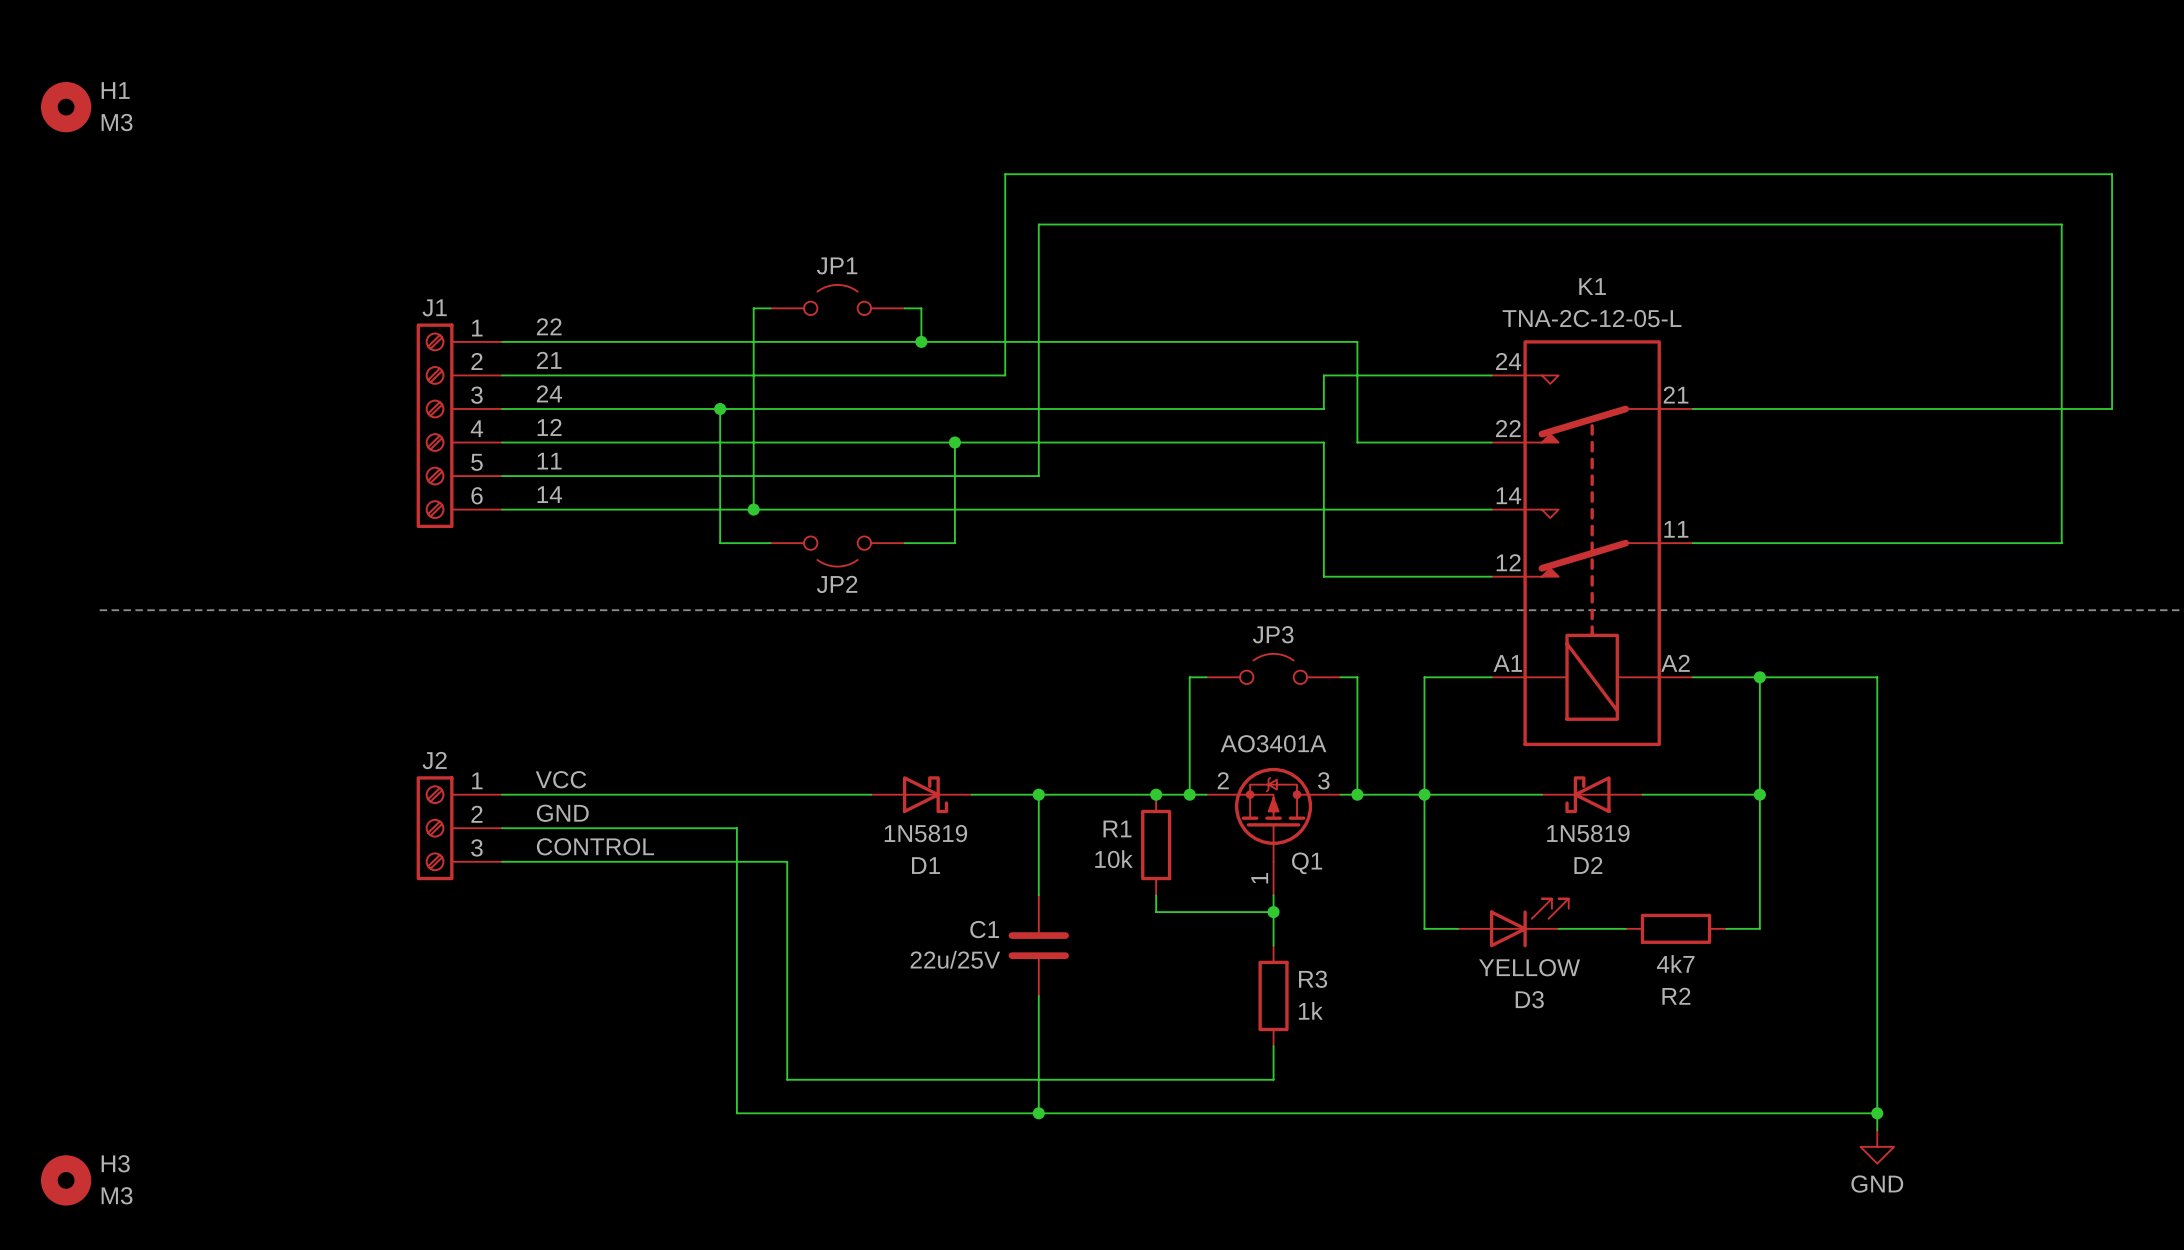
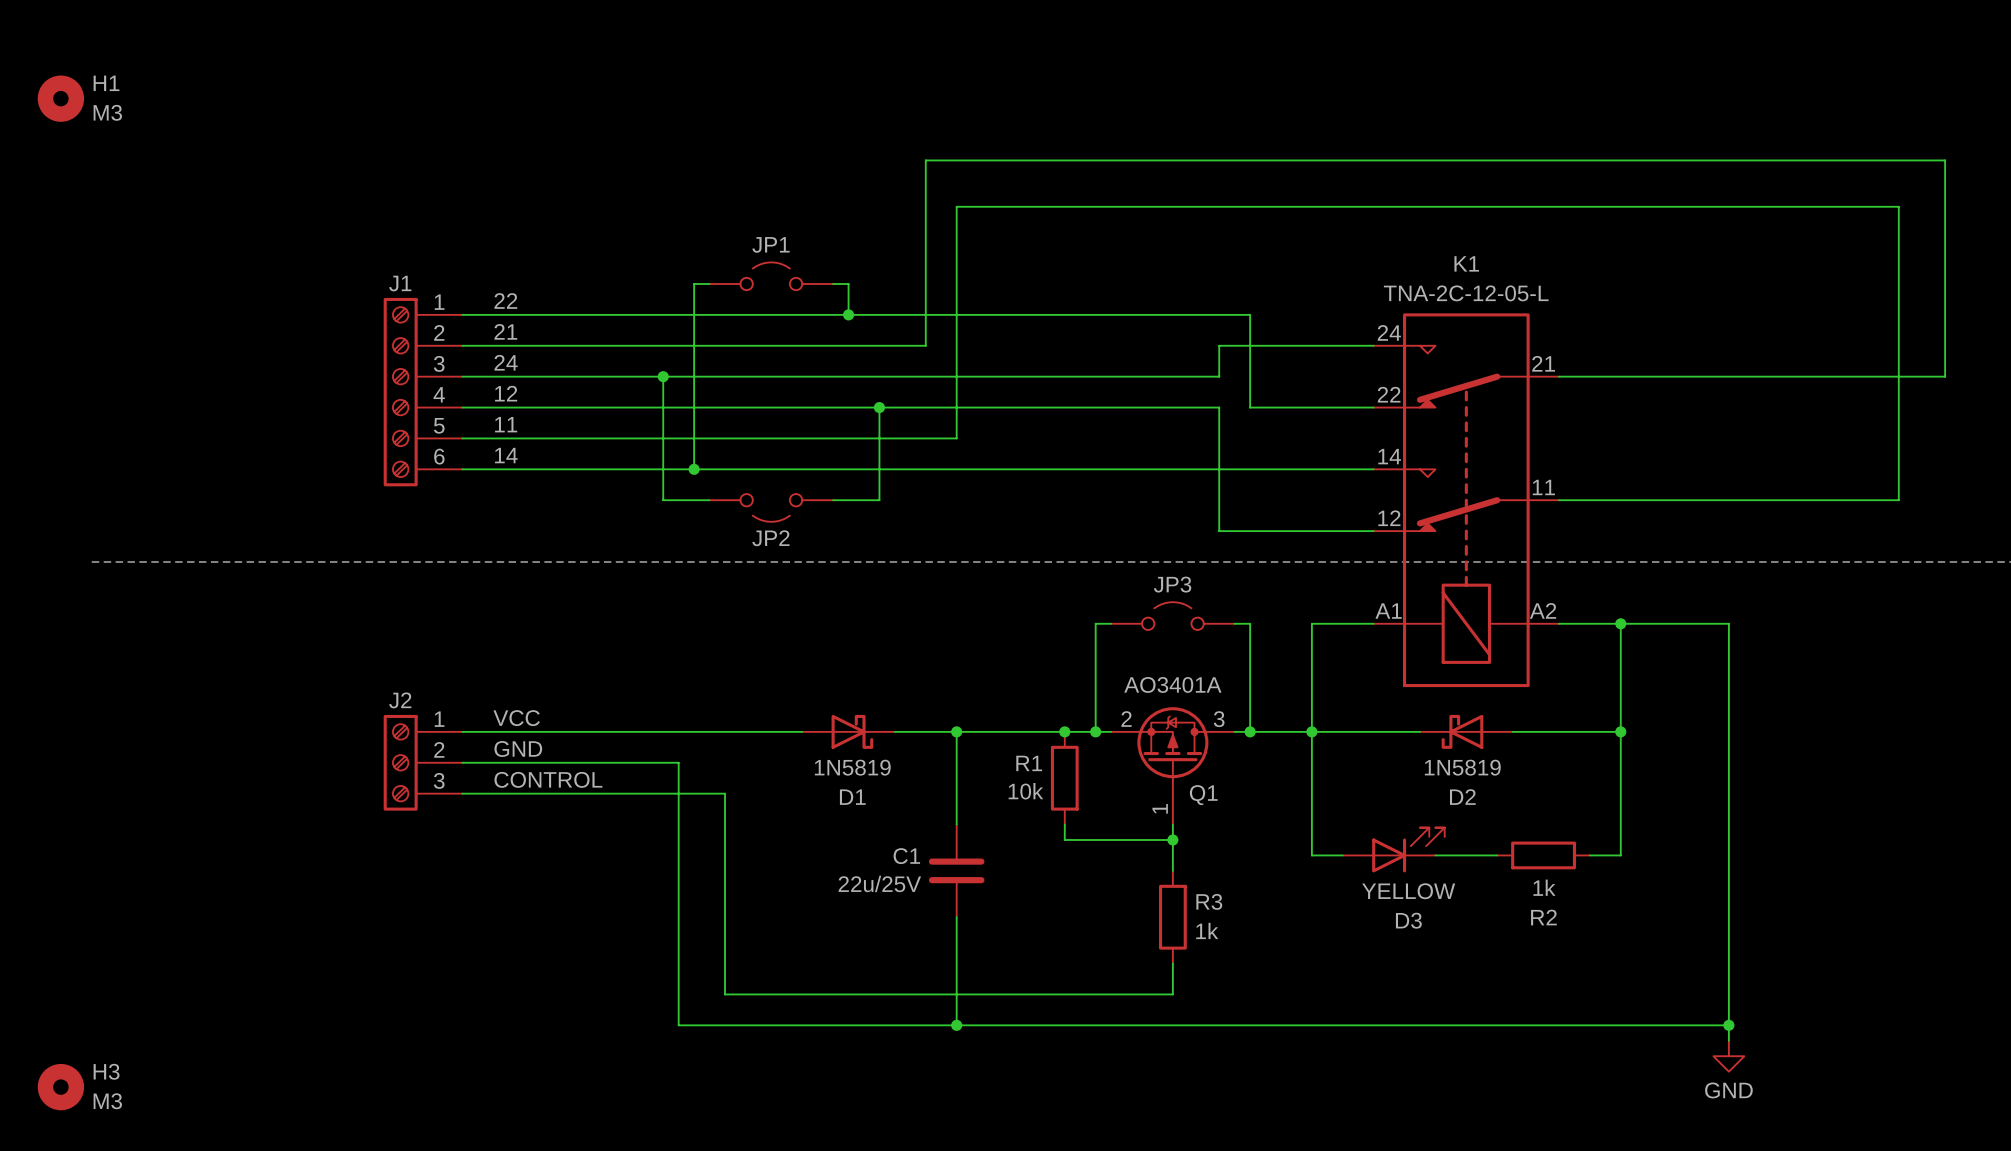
R2 value: 4k7 (1675, 963) -> 1k (1544, 887)

